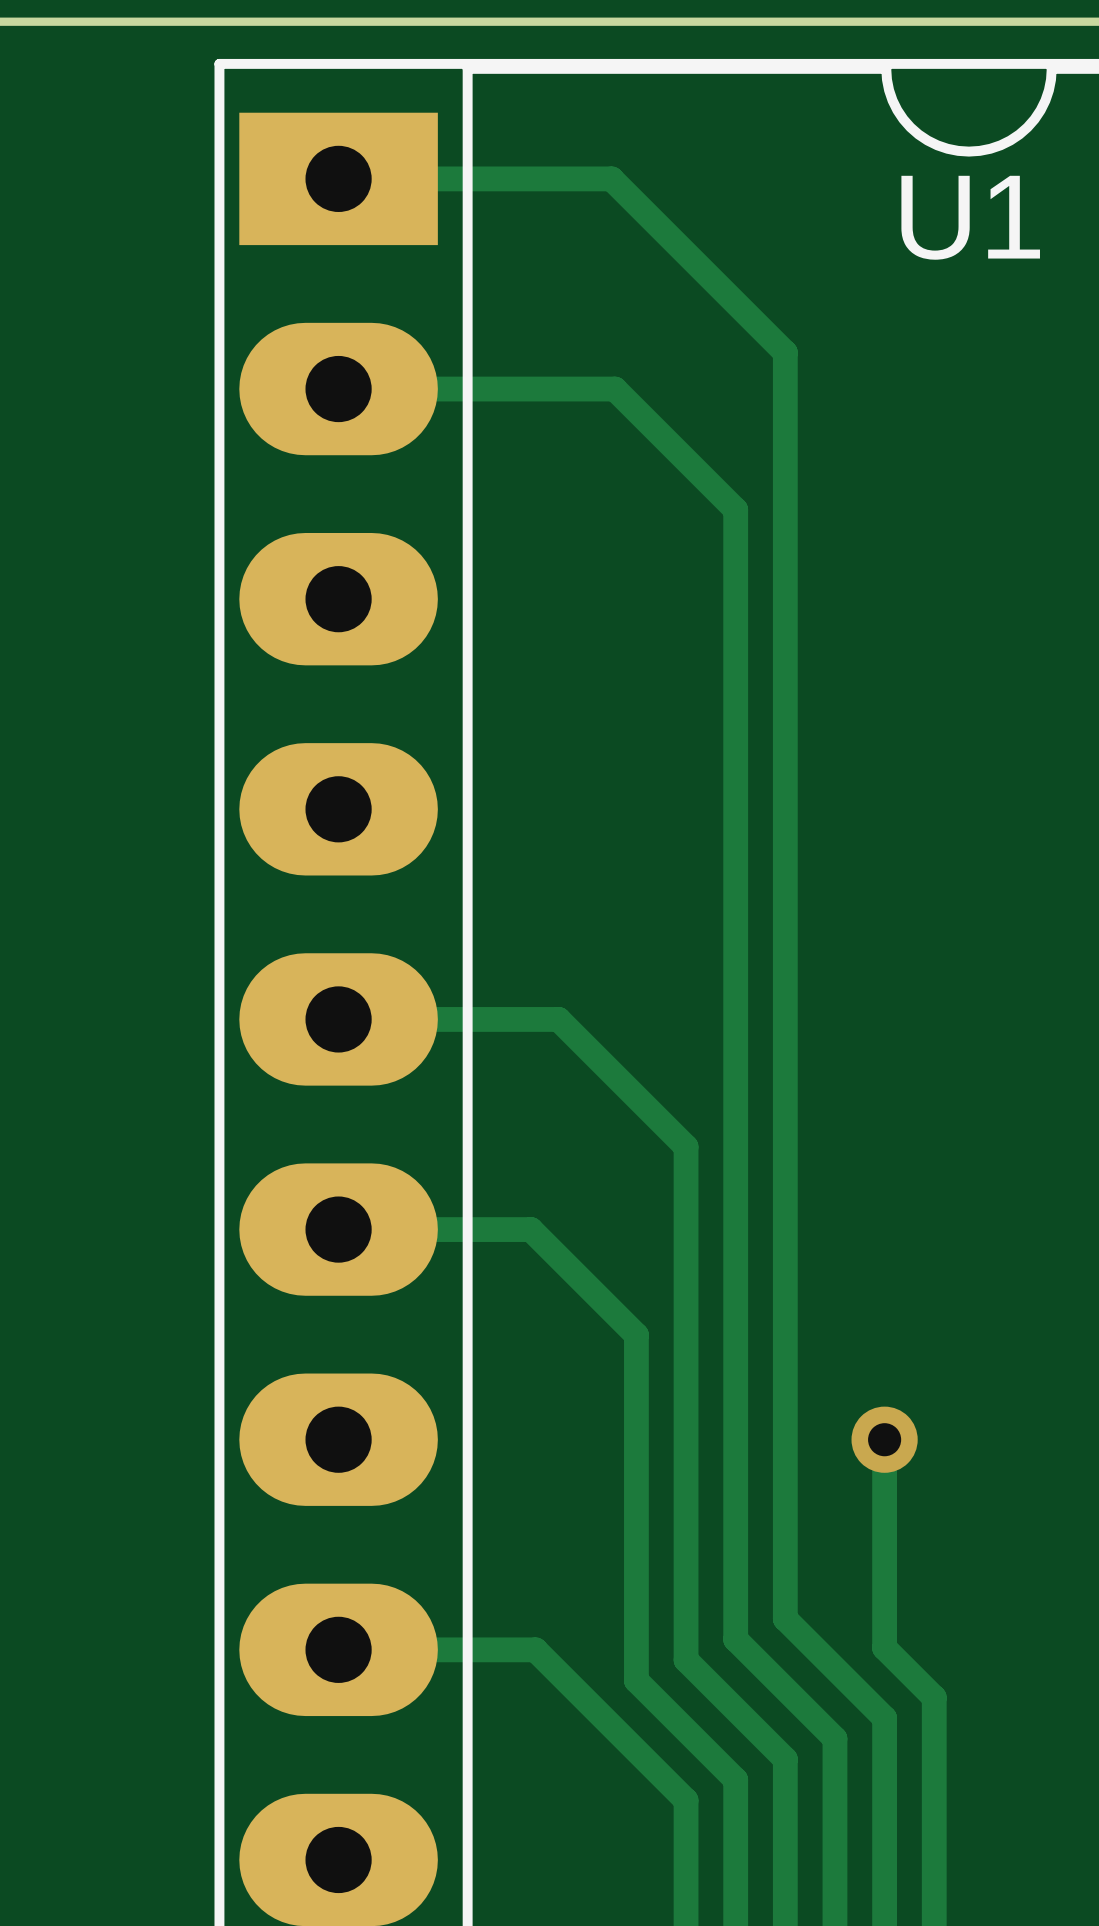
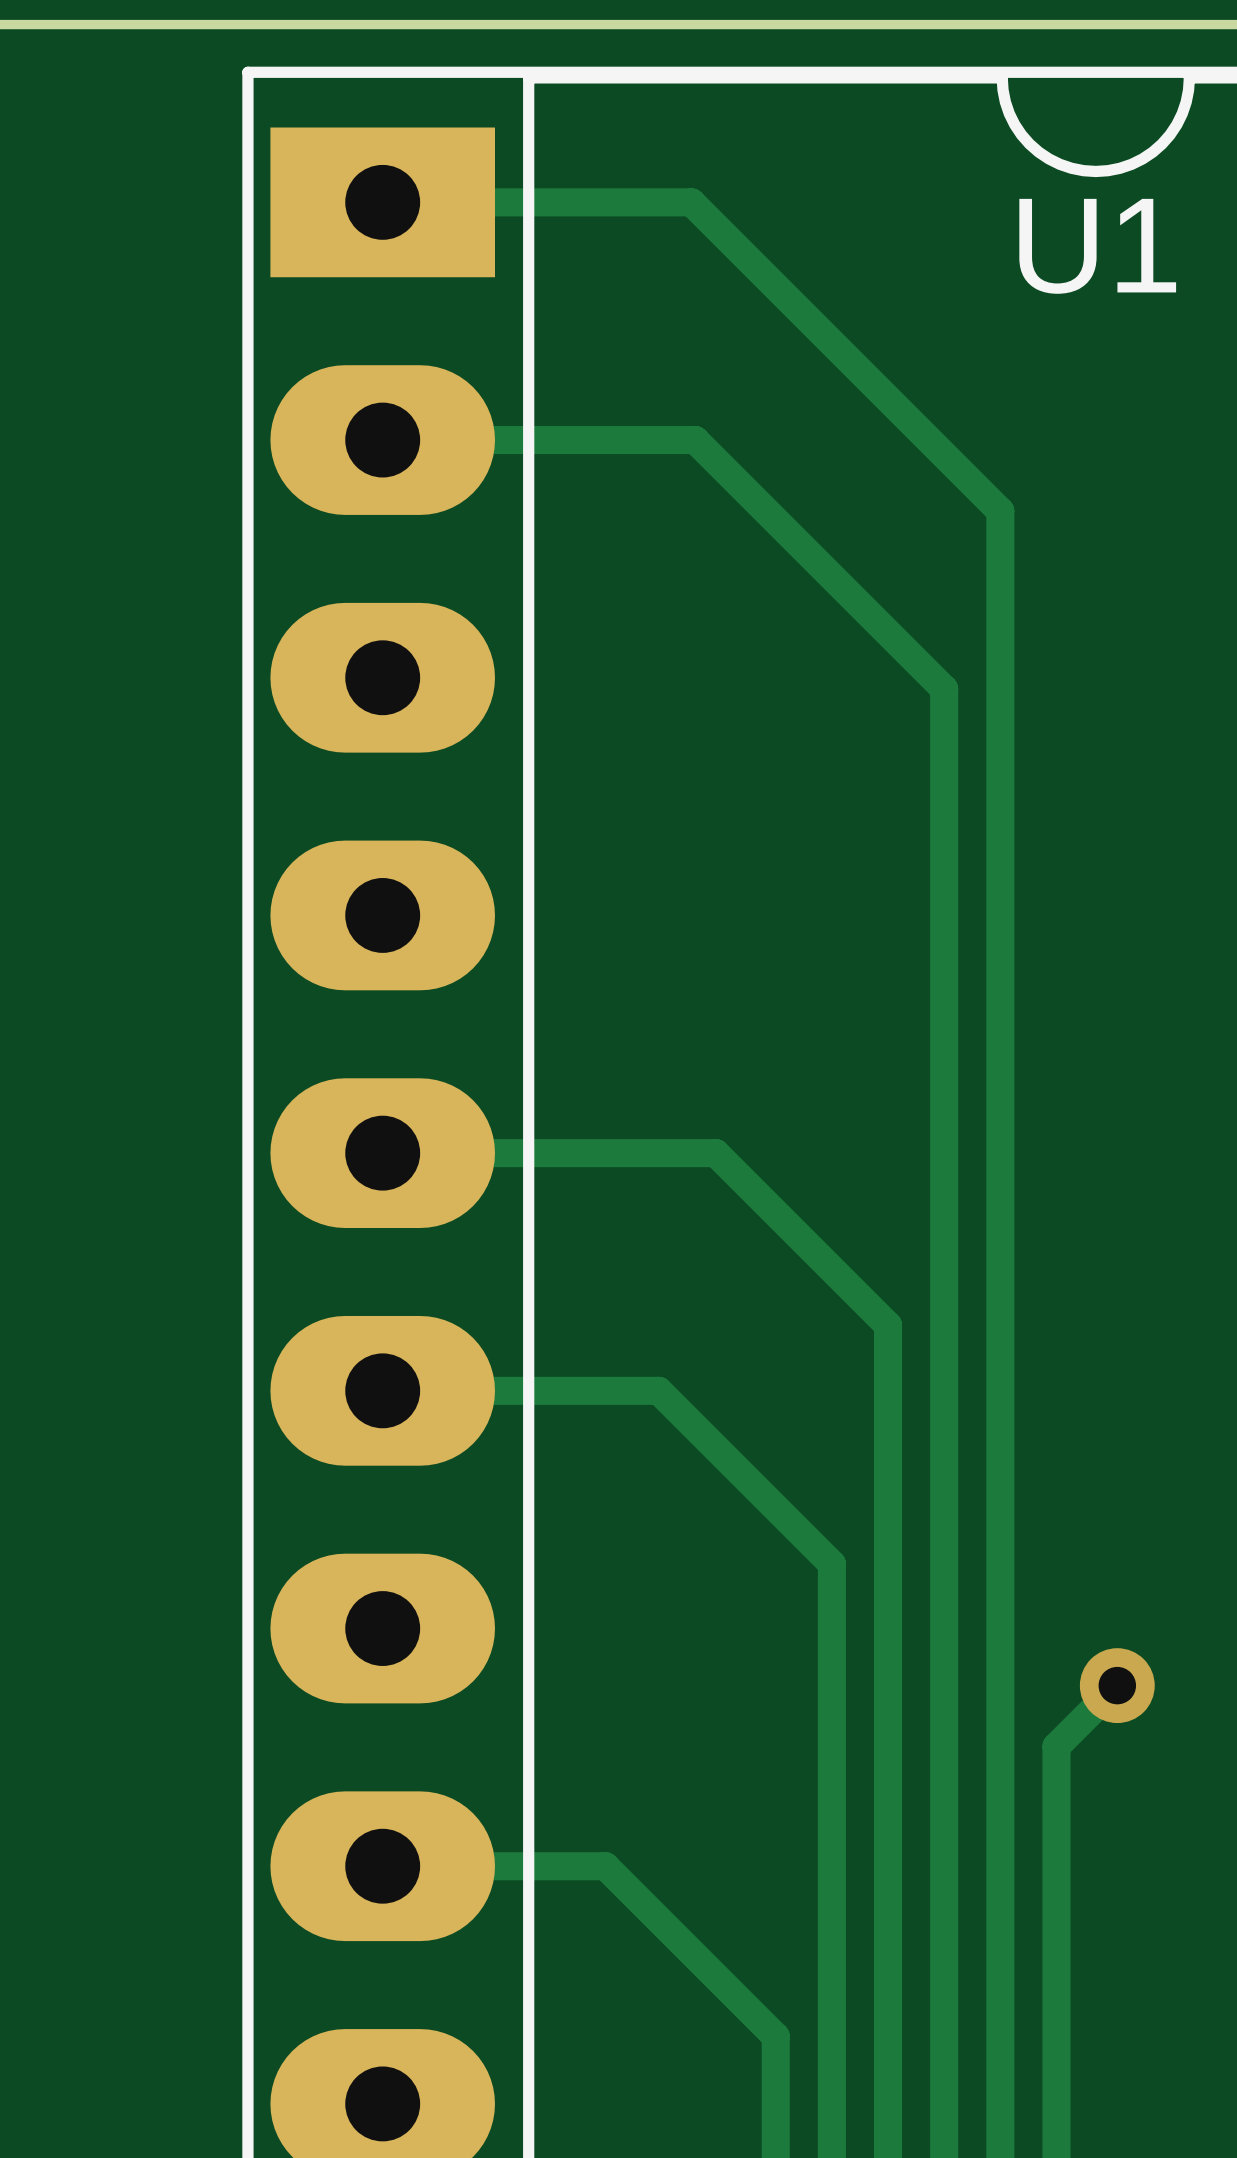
track: (785, 352) (785, 1171) -> (888, 398) (1000, 511) (1000, 1628)
track: (735, 509) (735, 1382) -> (831, 576) (944, 688) (944, 1966)
track: (558, 1019) (686, 1146) (686, 1660) (785, 1759) -> (631, 1153) (715, 1153) (888, 1325)
track: (530, 1229) (636, 1335) (636, 1680) (735, 1779) -> (600, 1390) (658, 1390) (831, 1563)
via position: (884, 1439) -> (1117, 1685)
track: none -> (1117, 1685) (1056, 1746) (1056, 1920)
track: (785, 1618) (884, 1718) -> (888, 1831) (888, 1990)
track: (735, 1639) (834, 1738) -> (831, 1854) (831, 2013)
track: (884, 1647) (934, 1697) -> (1000, 1864) (1000, 1943)

